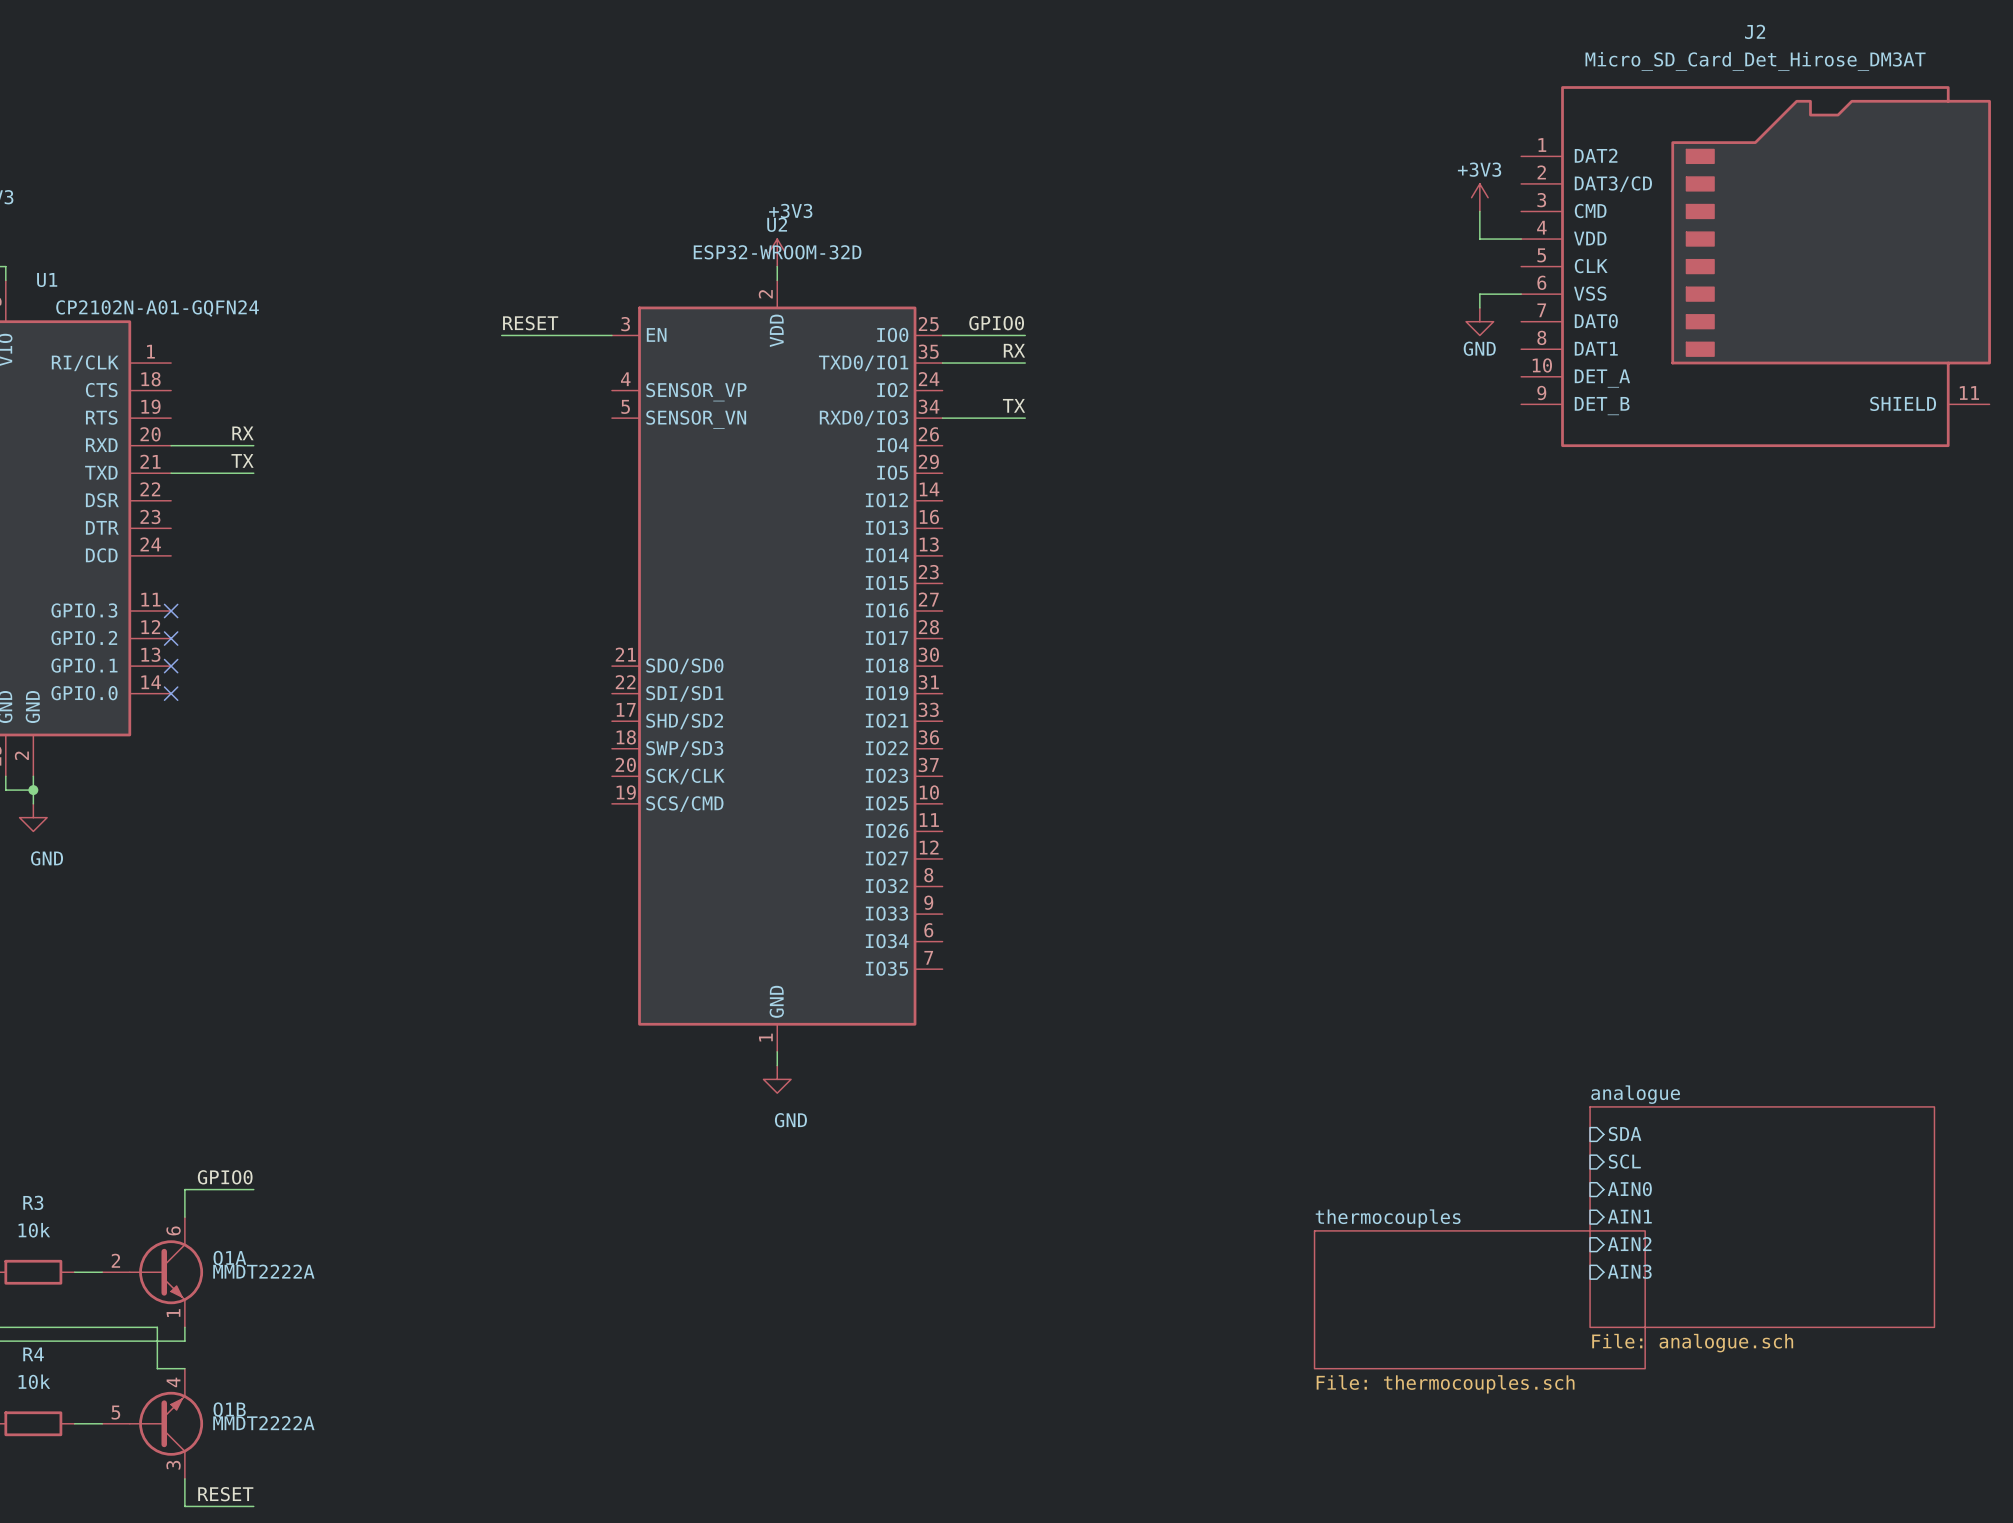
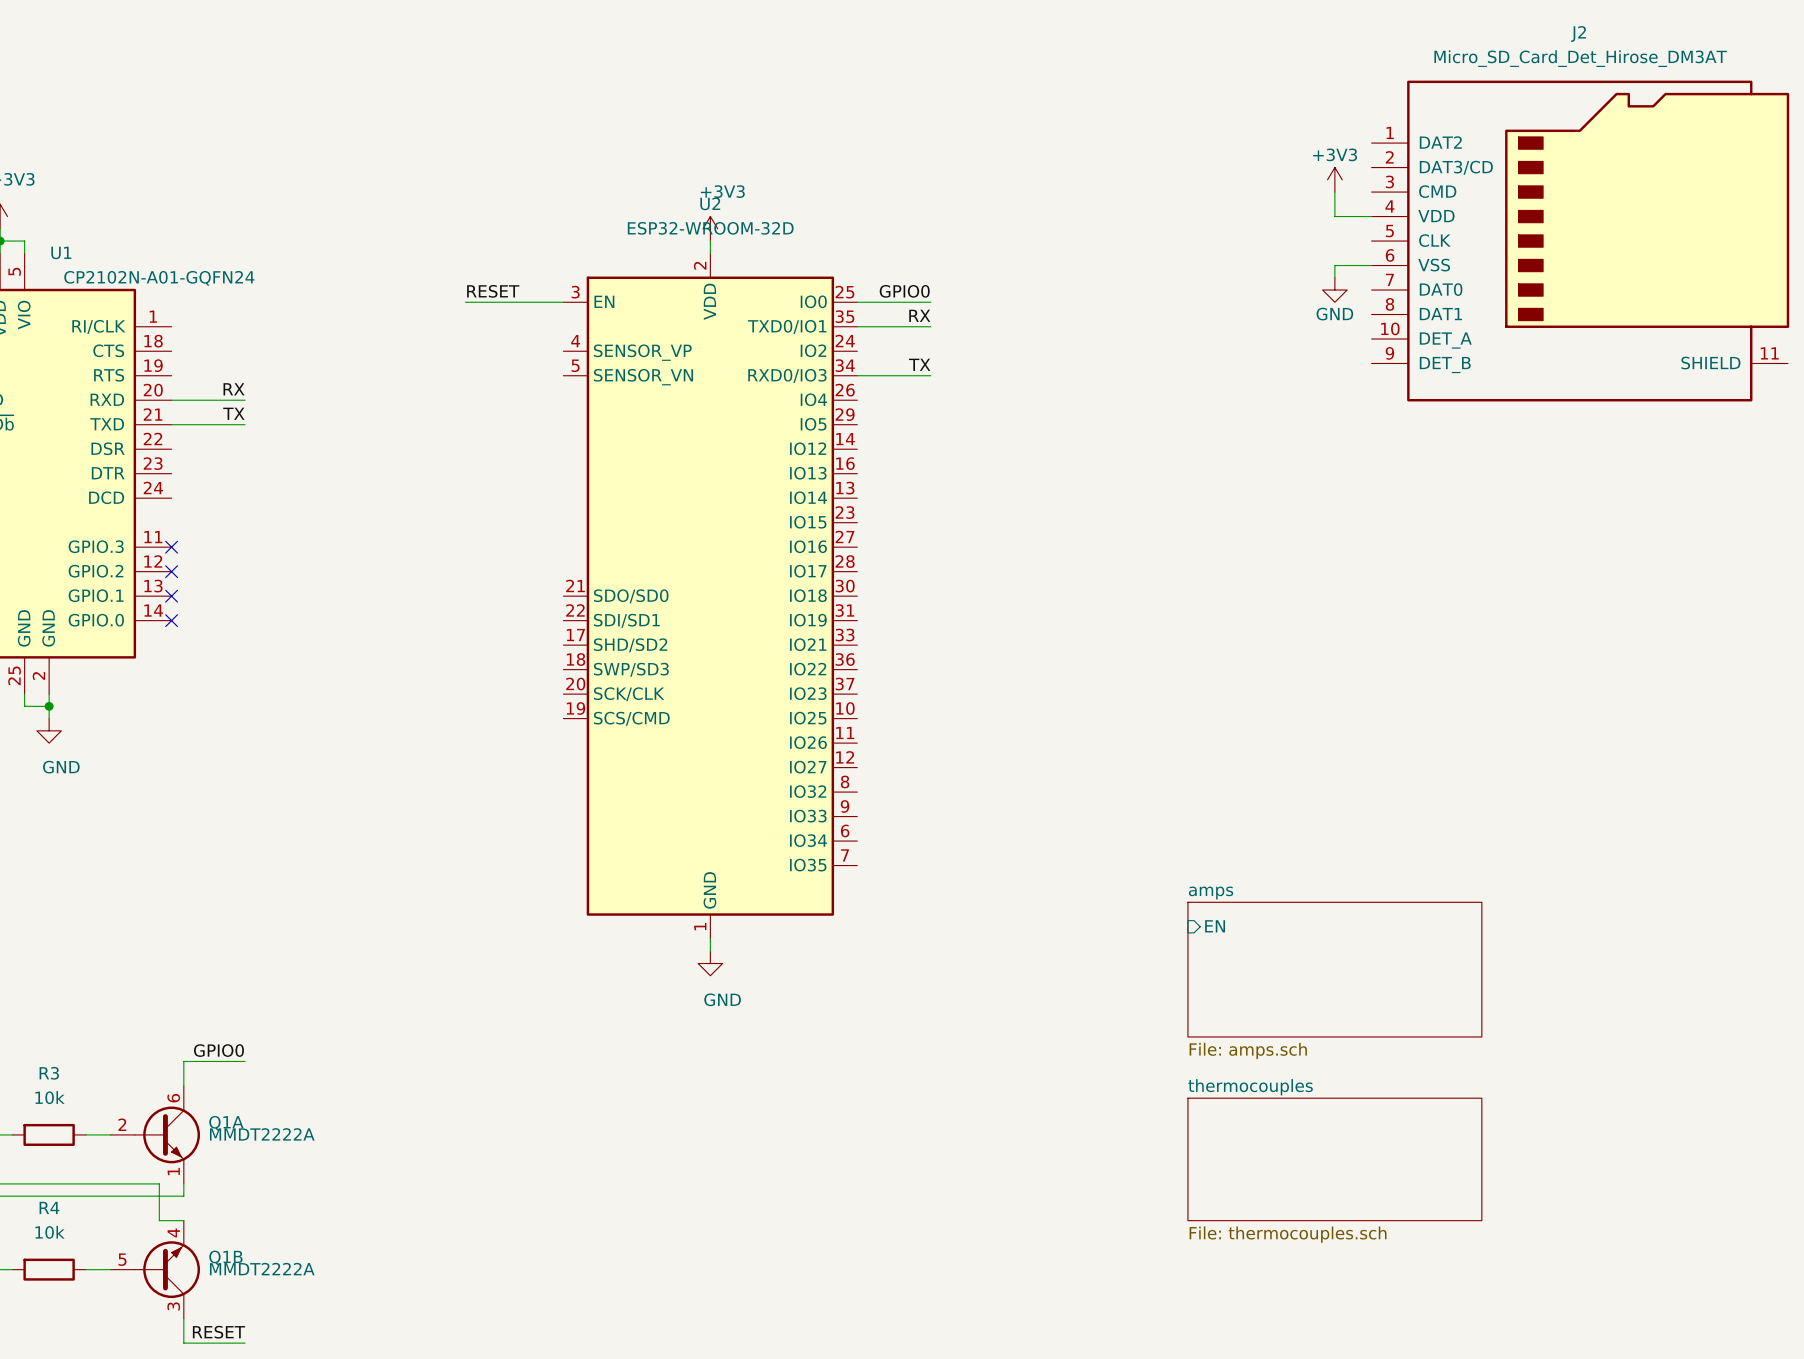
sheet pin: none -> EN (1215, 926)
sheet amps: none -> File: amps.sch (1334, 969)
sheet pin: SDA (1625, 1133) -> none
sheet pin: SCL (1624, 1161) -> none
sheet pin: AIN0 (1629, 1189) -> none
sheet pin: AIN1 (1629, 1216) -> none
sheet analogue: File: analogue.sch (1762, 1217) -> none
sheet pin: AIN2 (1629, 1244) -> none
sheet pin: AIN3 (1629, 1271) -> none

